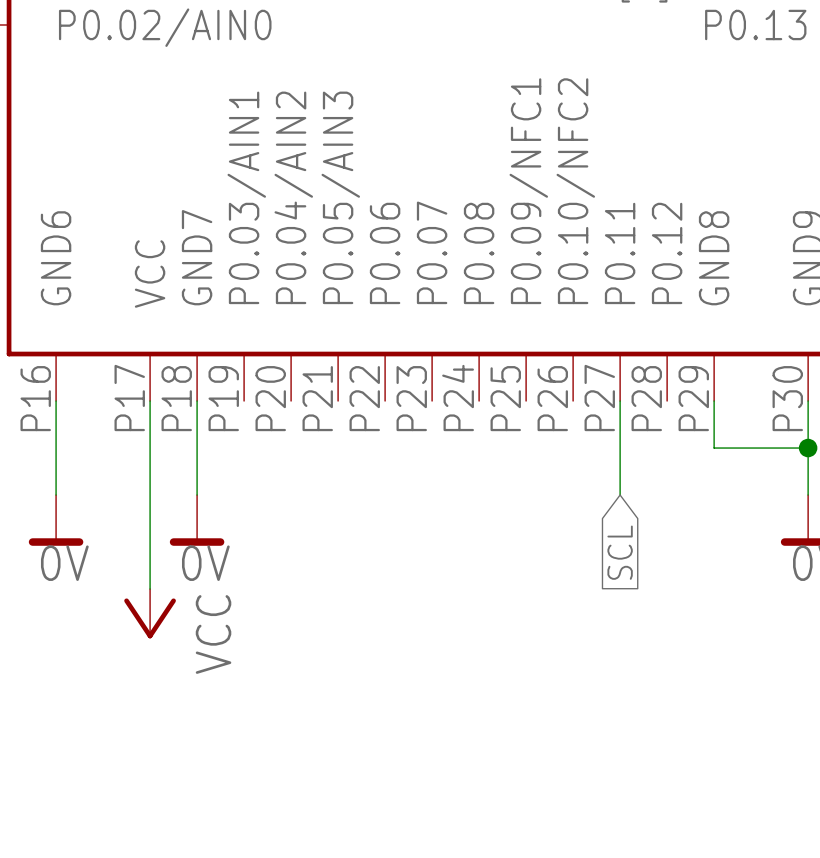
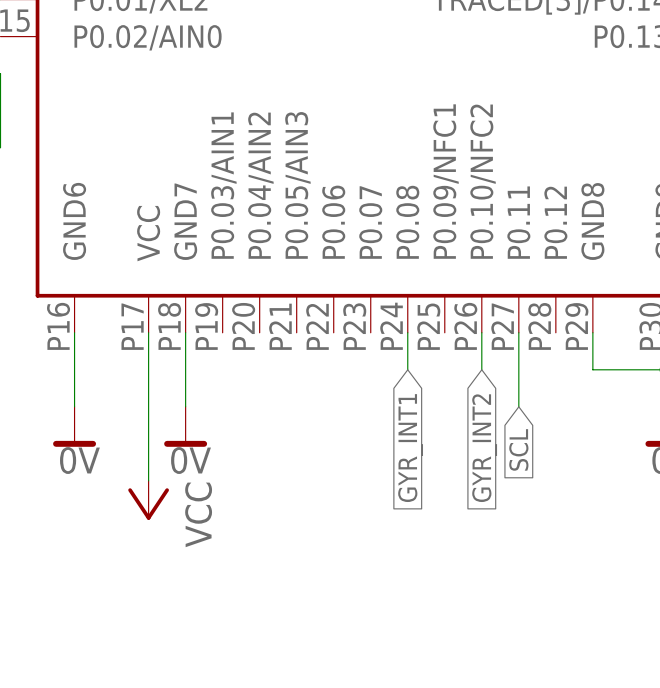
wire: none -> (407, 332) (407, 369)
wire: none -> (481, 332) (481, 369)
global label: none -> GYR_INT1 (410, 448)
global label: none -> GYR_INT2 (484, 448)

